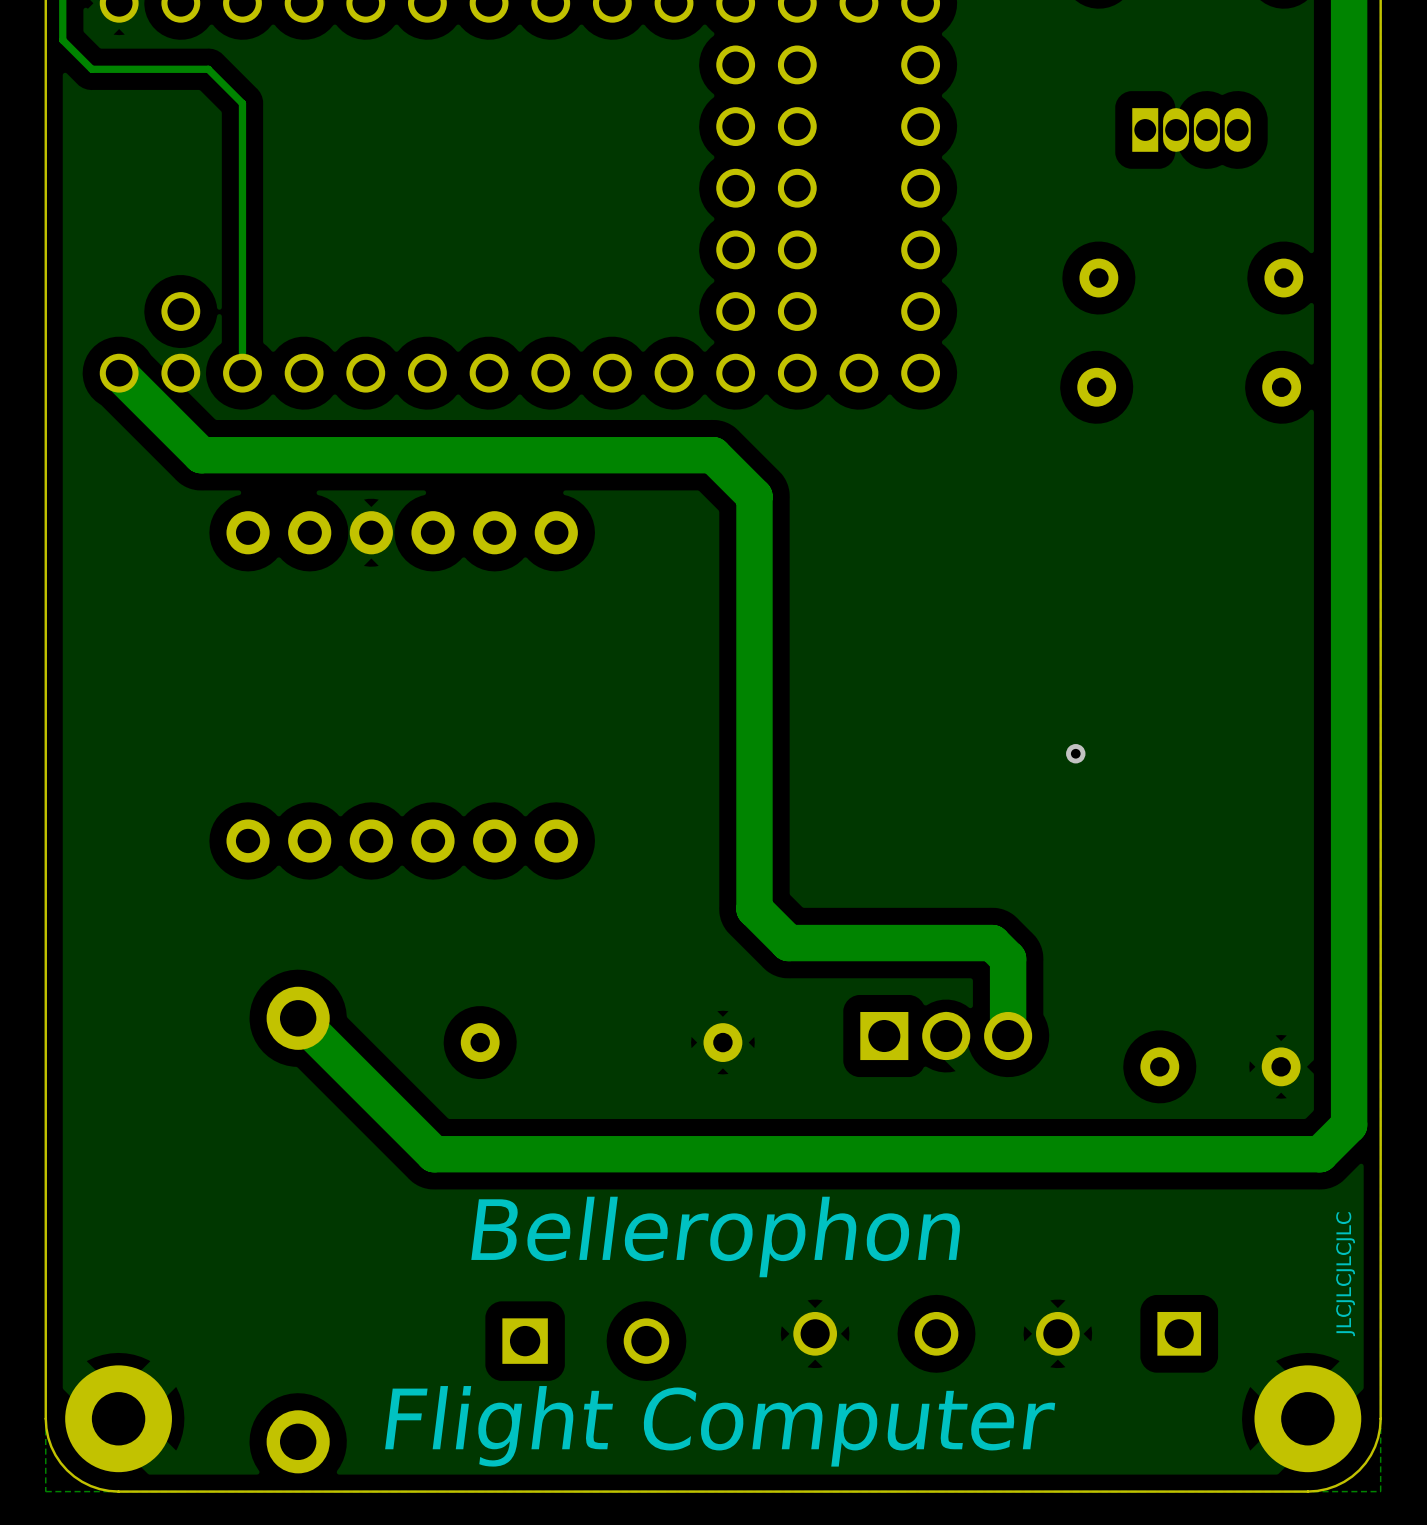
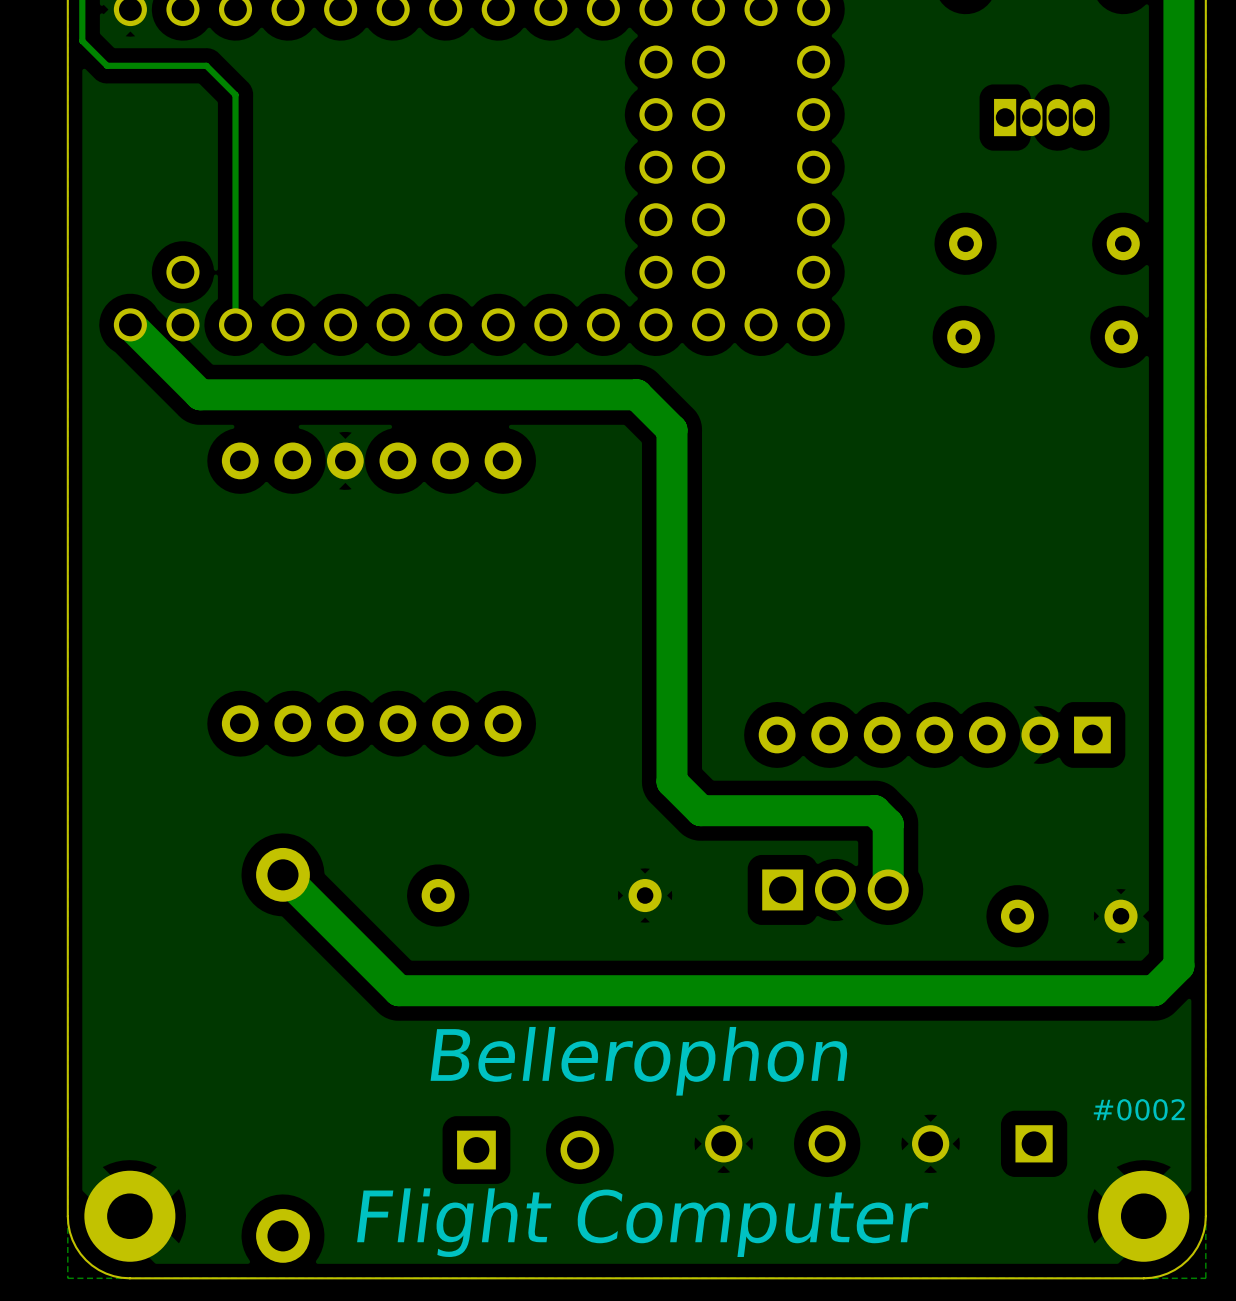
via: (1075, 753) -> none
part: none -> (934, 734)
text: JLCJLCJLCJLC (1345, 1274) -> none
text: none -> #0002 (1139, 1109)

